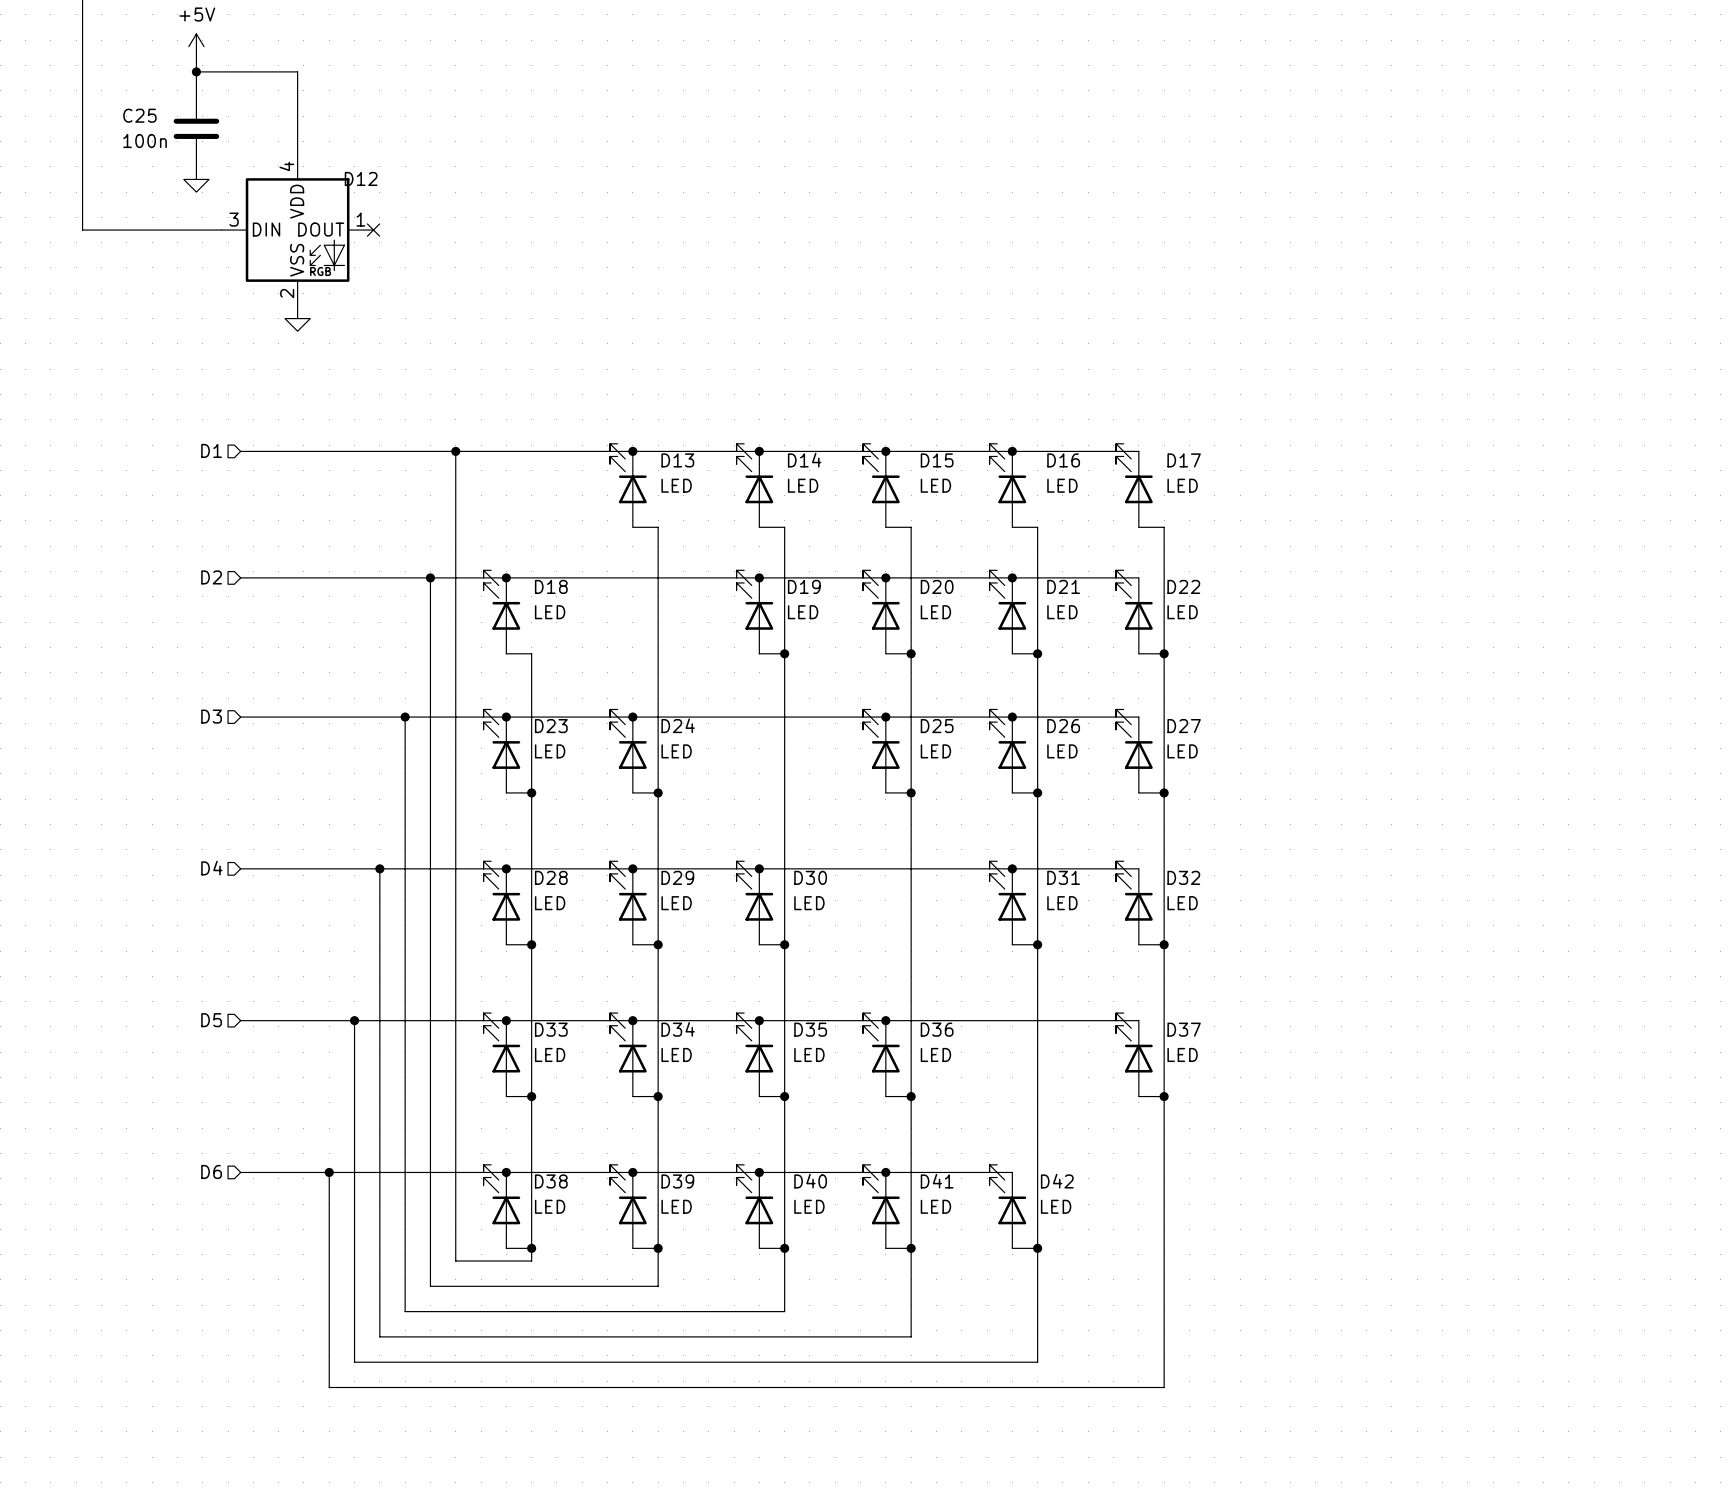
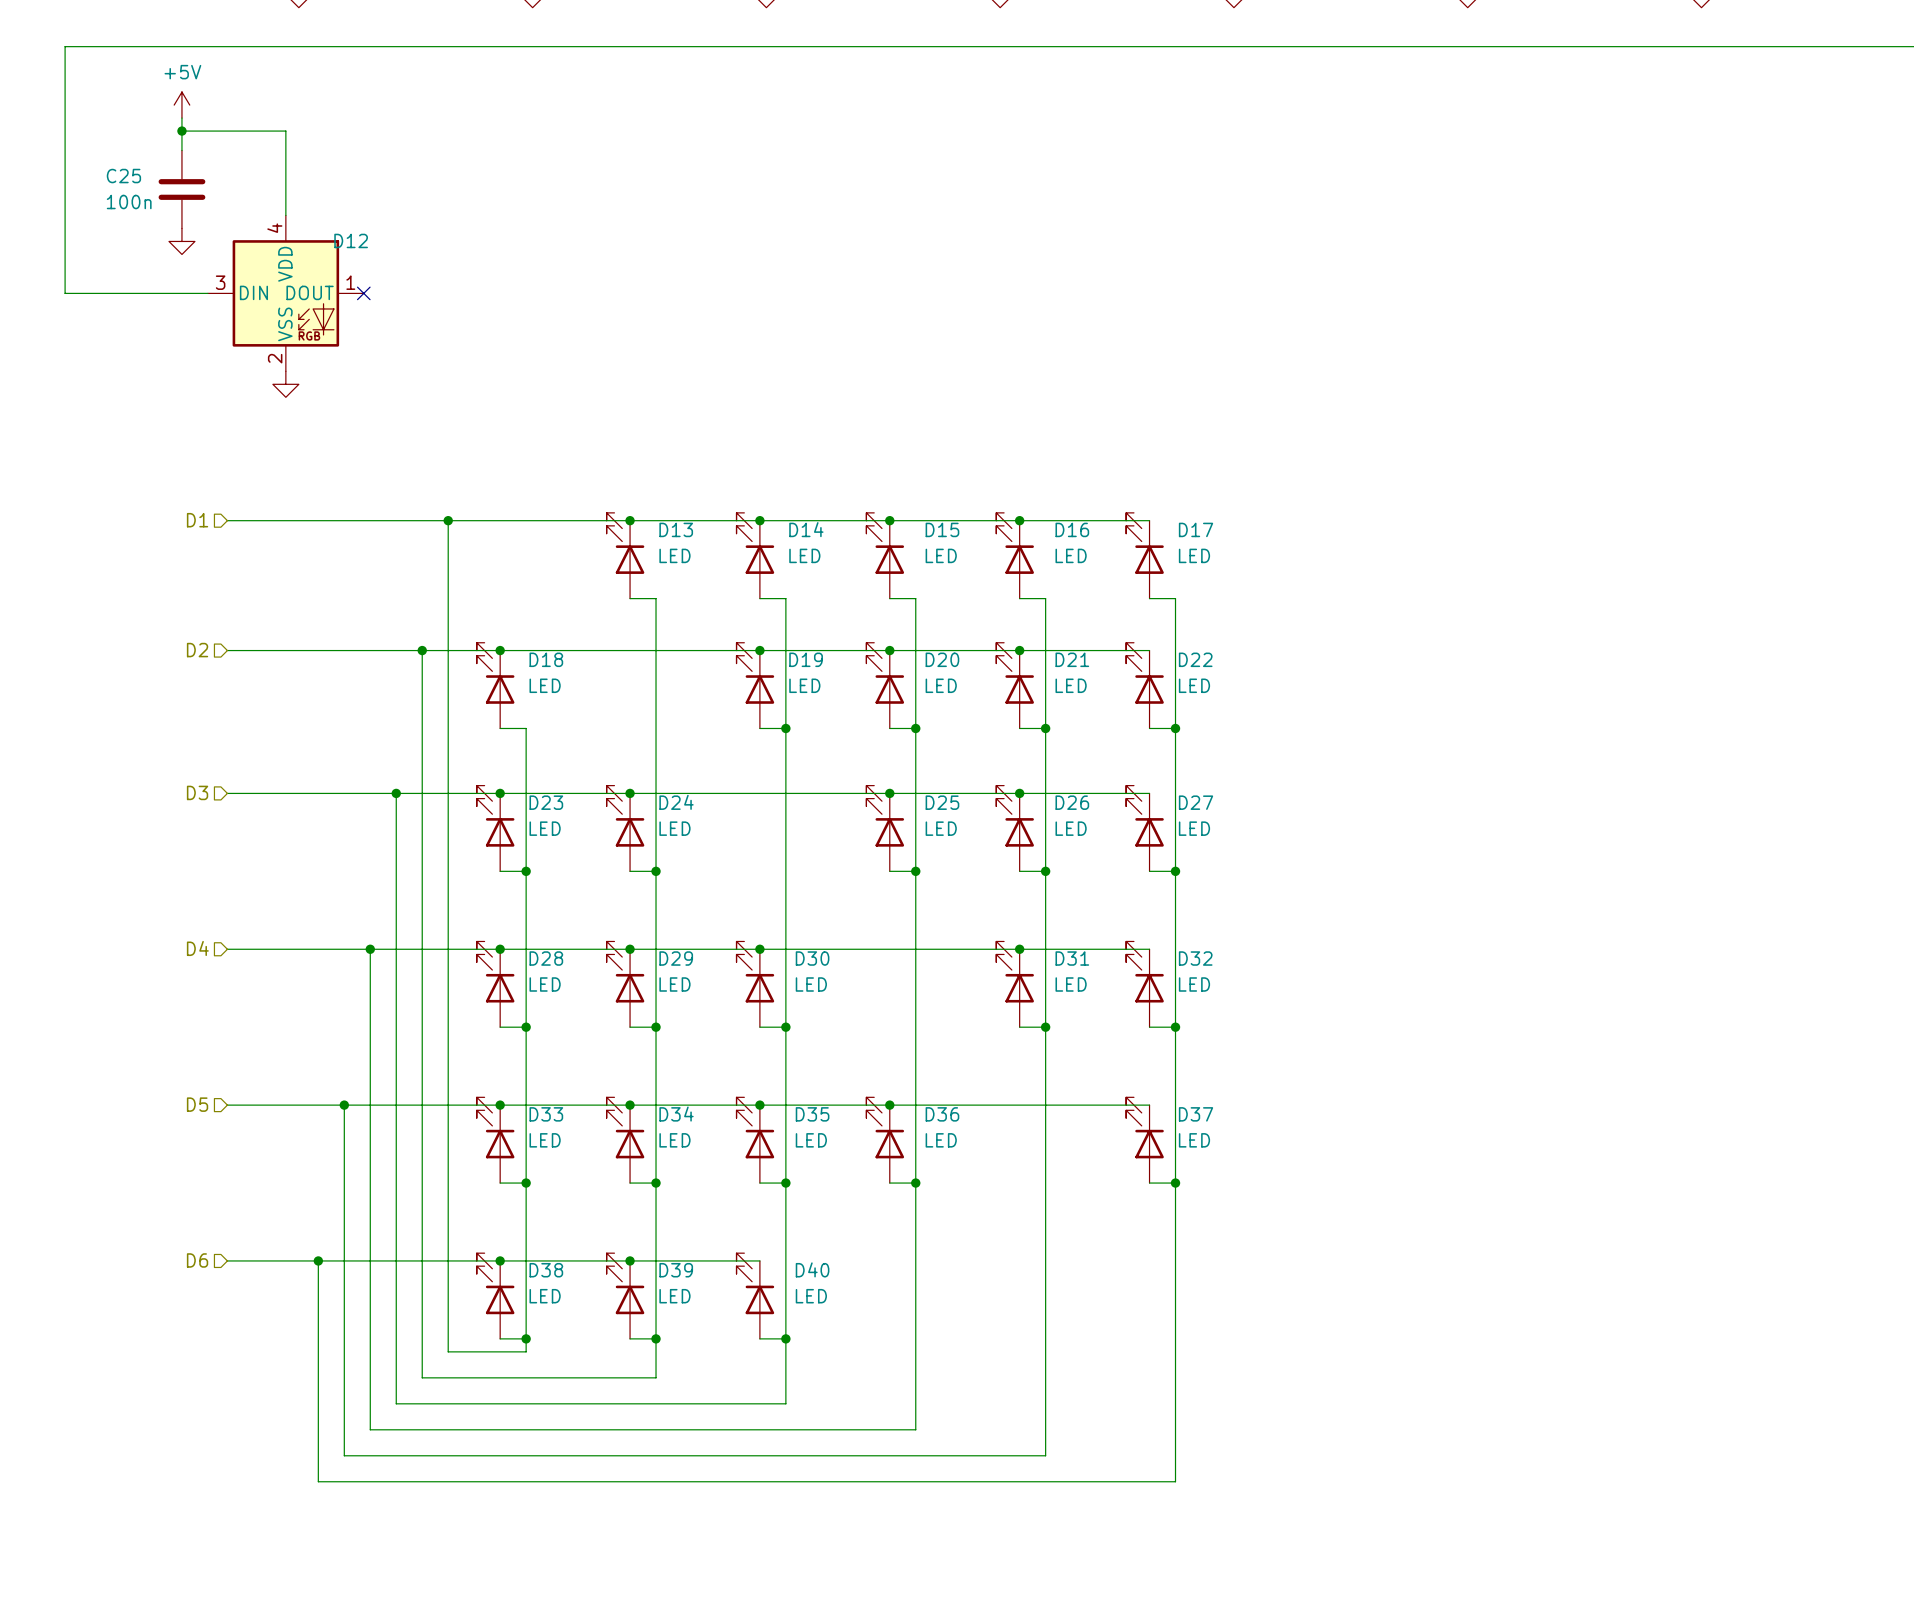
wire: (759, 1172) (1012, 1172) -> none
junction: (759, 1172) -> none
junction: (885, 1172) -> none
D41: LED (881, 1206) -> none
D42: LED (1007, 1206) -> none
wire: (885, 1248) (911, 1248) -> none
junction: (911, 1248) -> none
wire: (1012, 1248) (1037, 1248) -> none
junction: (1037, 1248) -> none

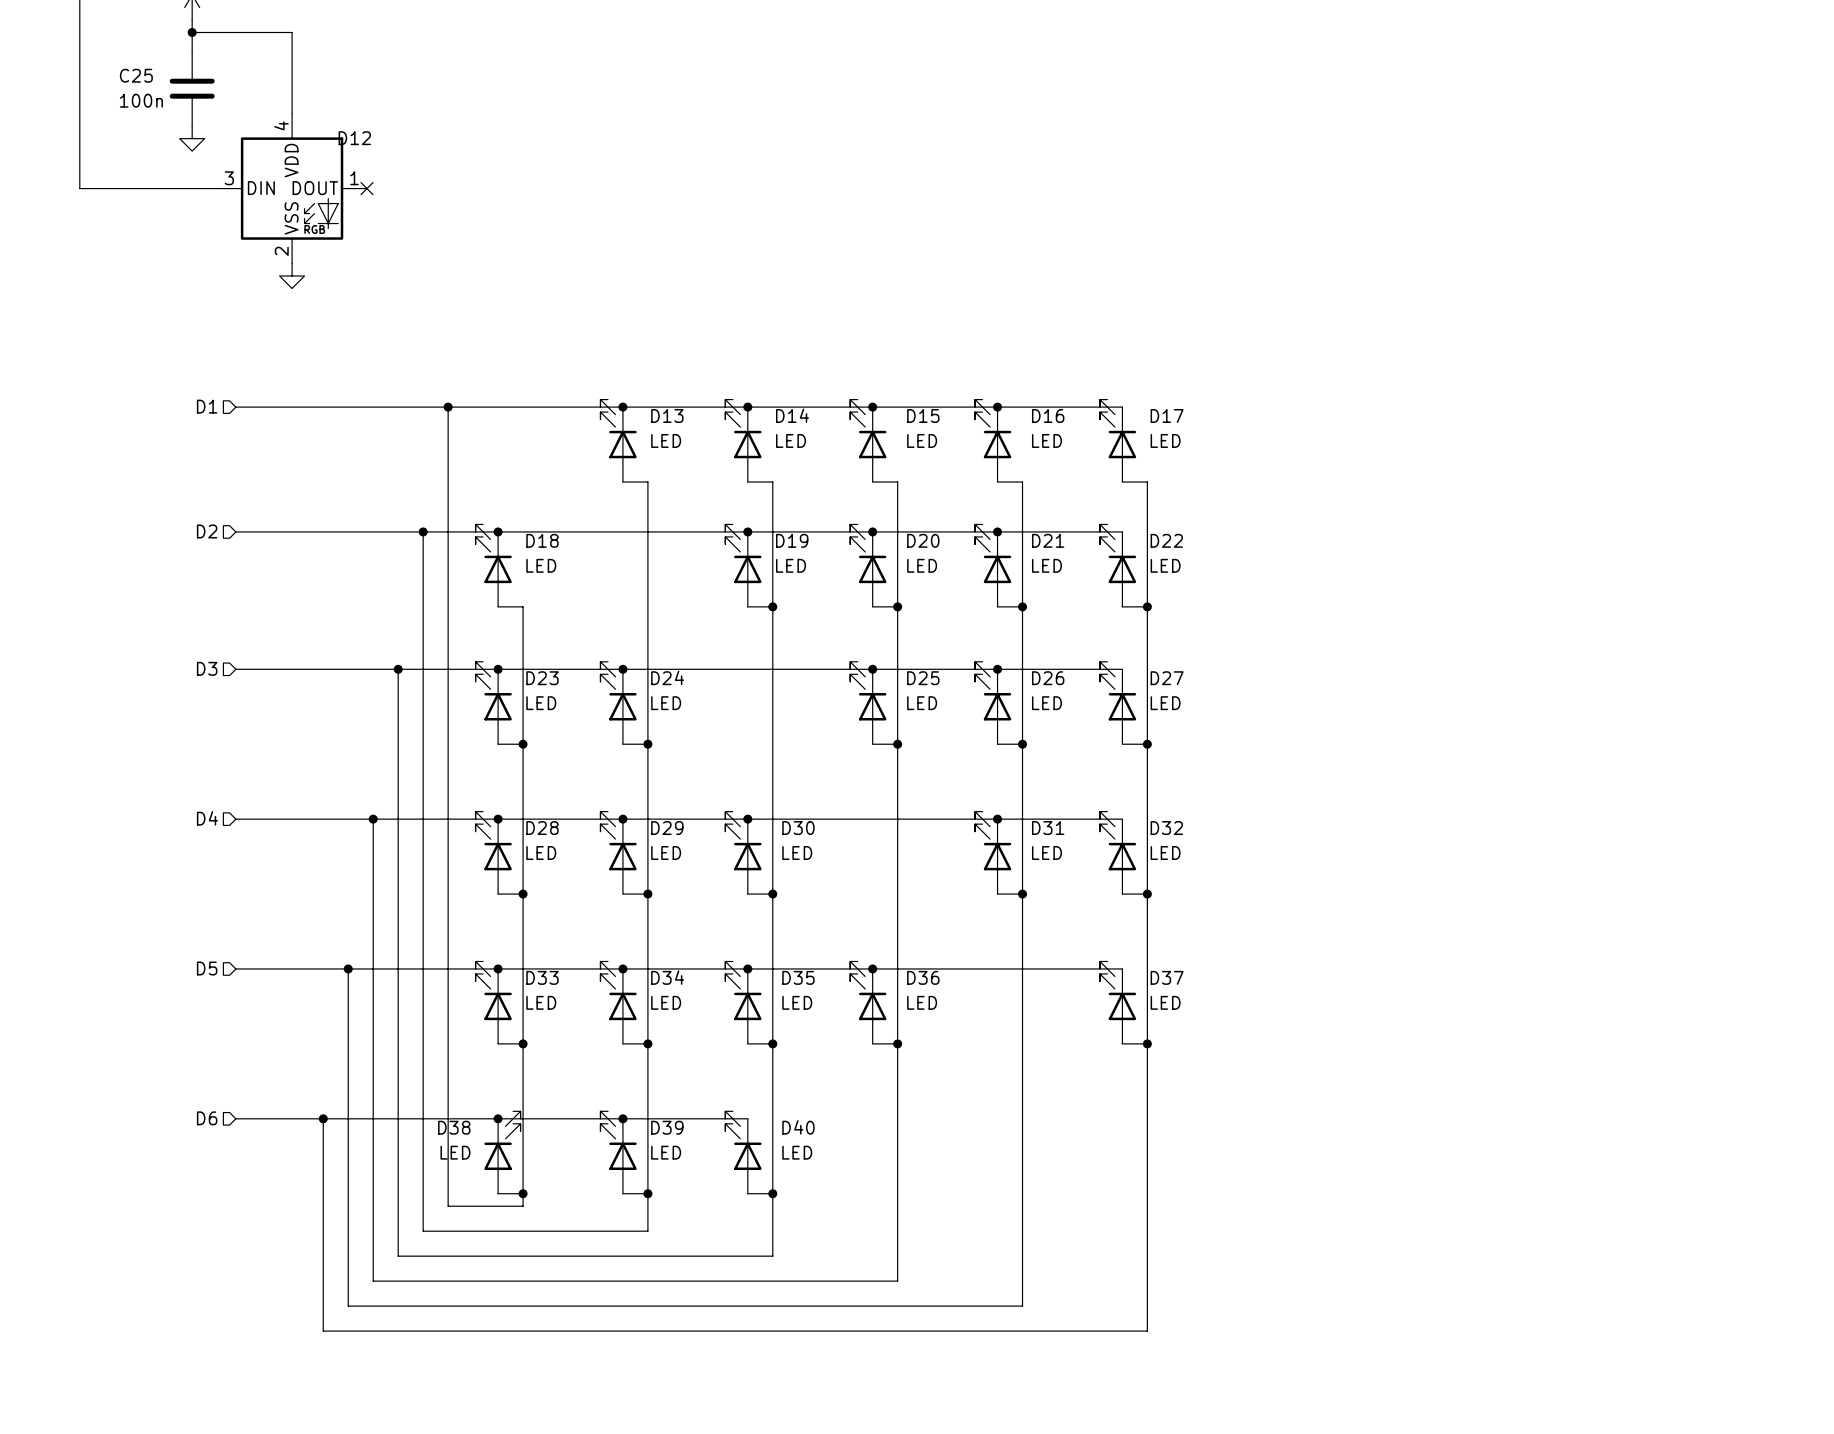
D38 flip: as is (495, 1283) -> left-right (502, 1140)

